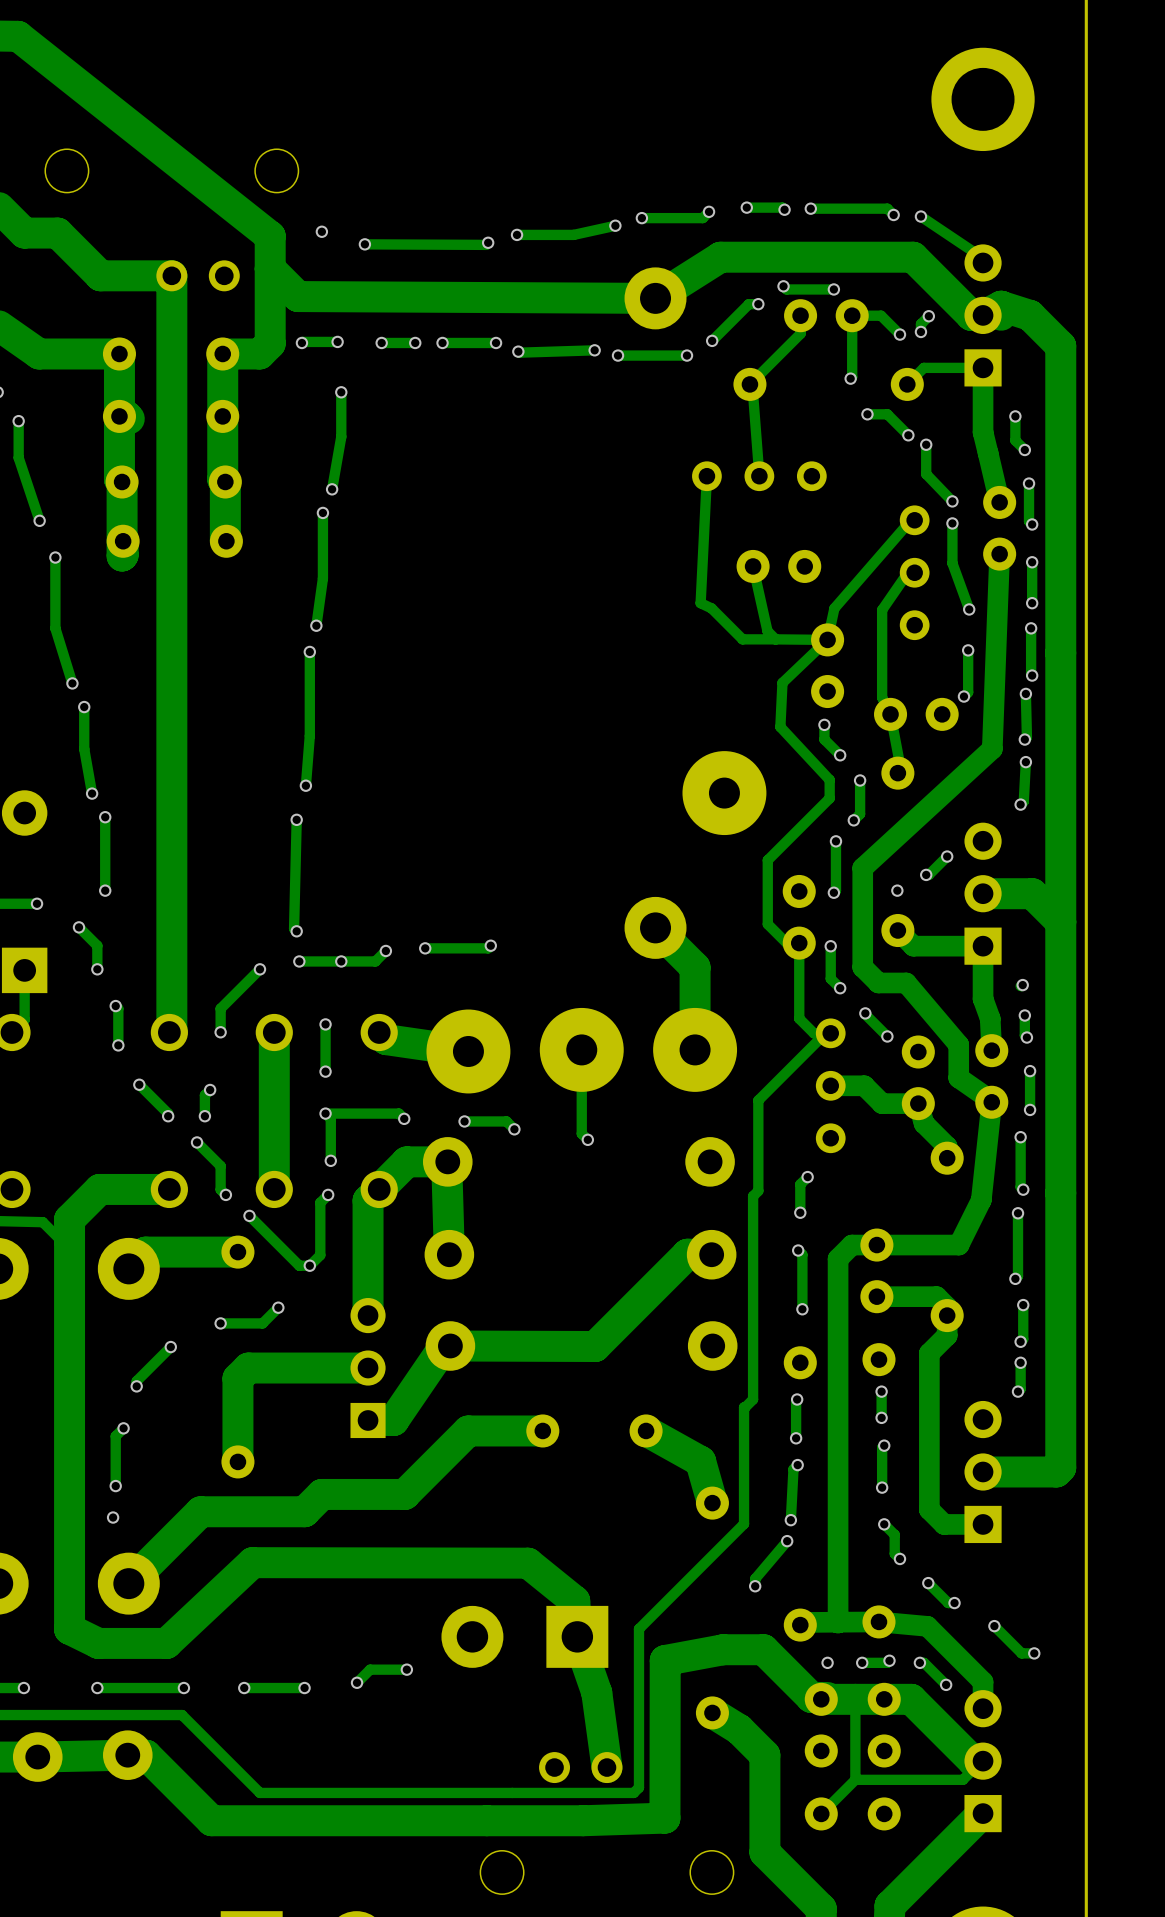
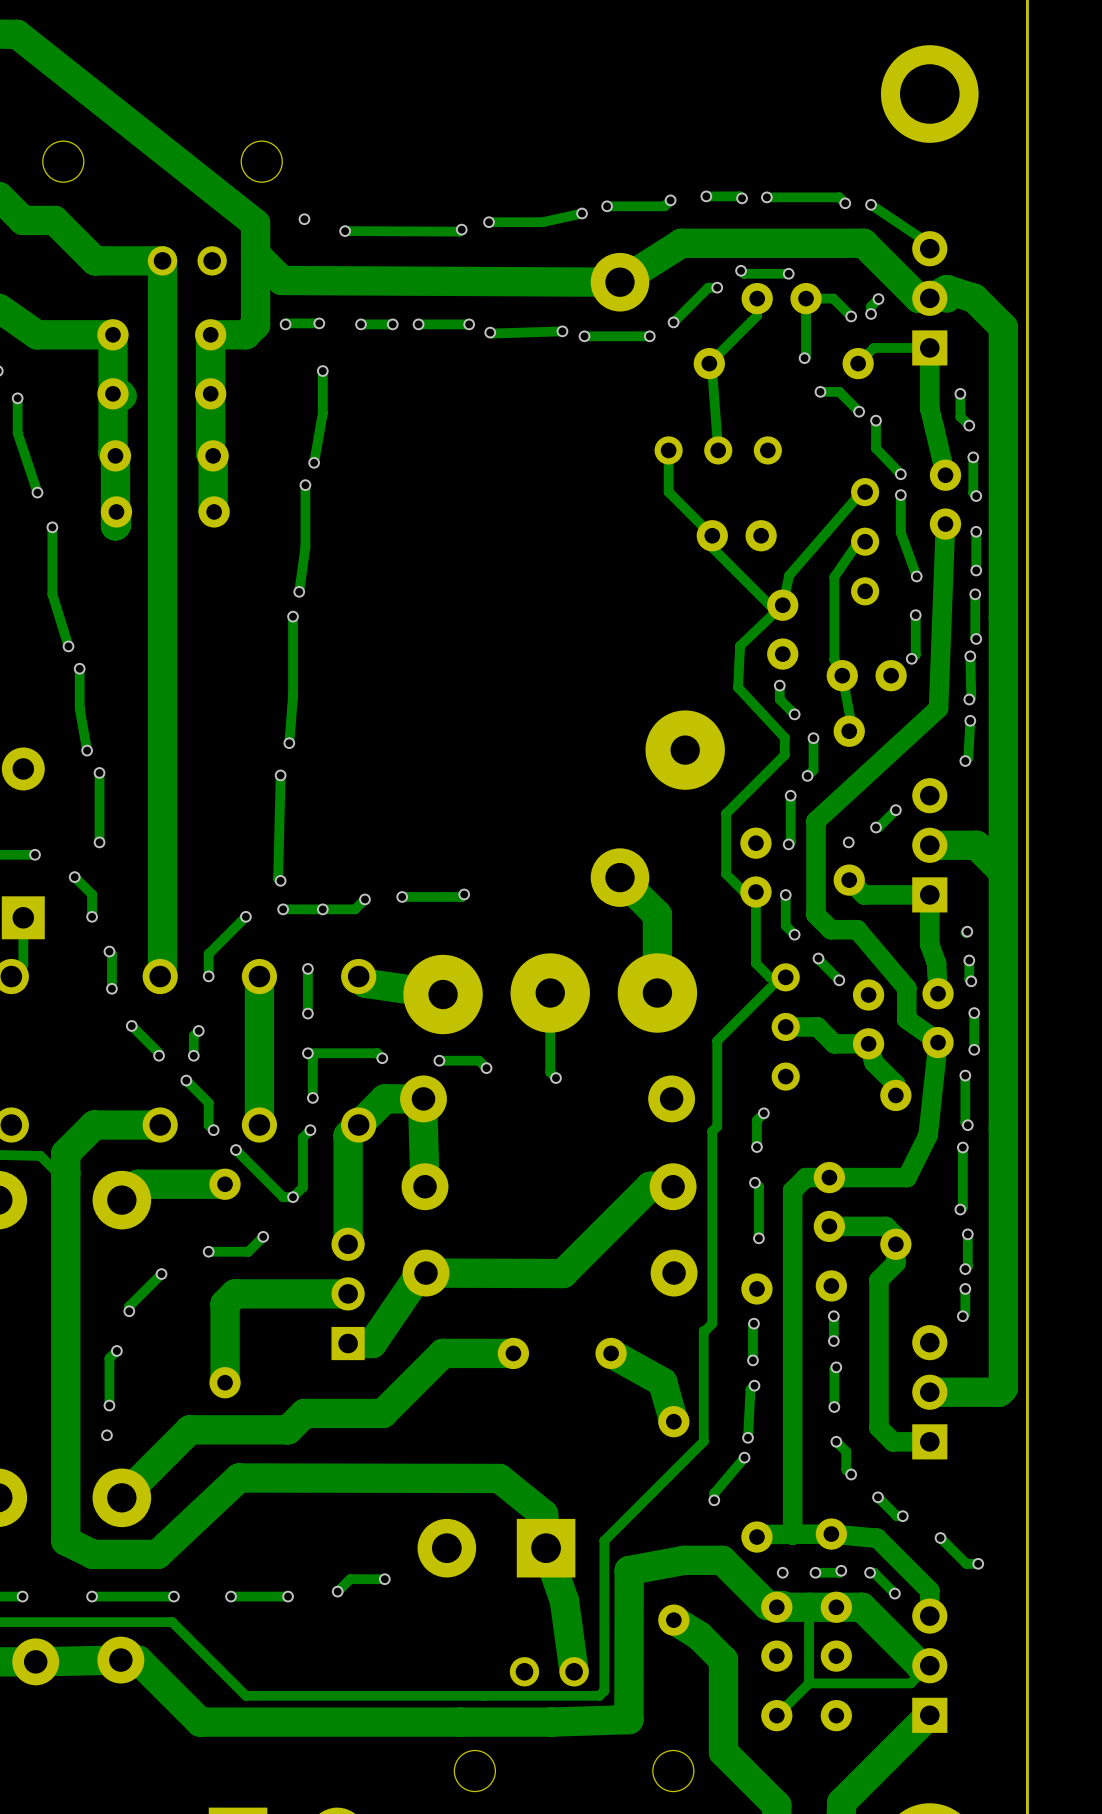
track: (706, 476) (700, 603) (711, 608) (742, 639) (775, 639) -> (668, 450) (668, 492) (712, 535) (712, 547) (769, 605) (782, 605)
track: (753, 566) (767, 631) (775, 639) -> none
track: (775, 639) (827, 639) -> none

